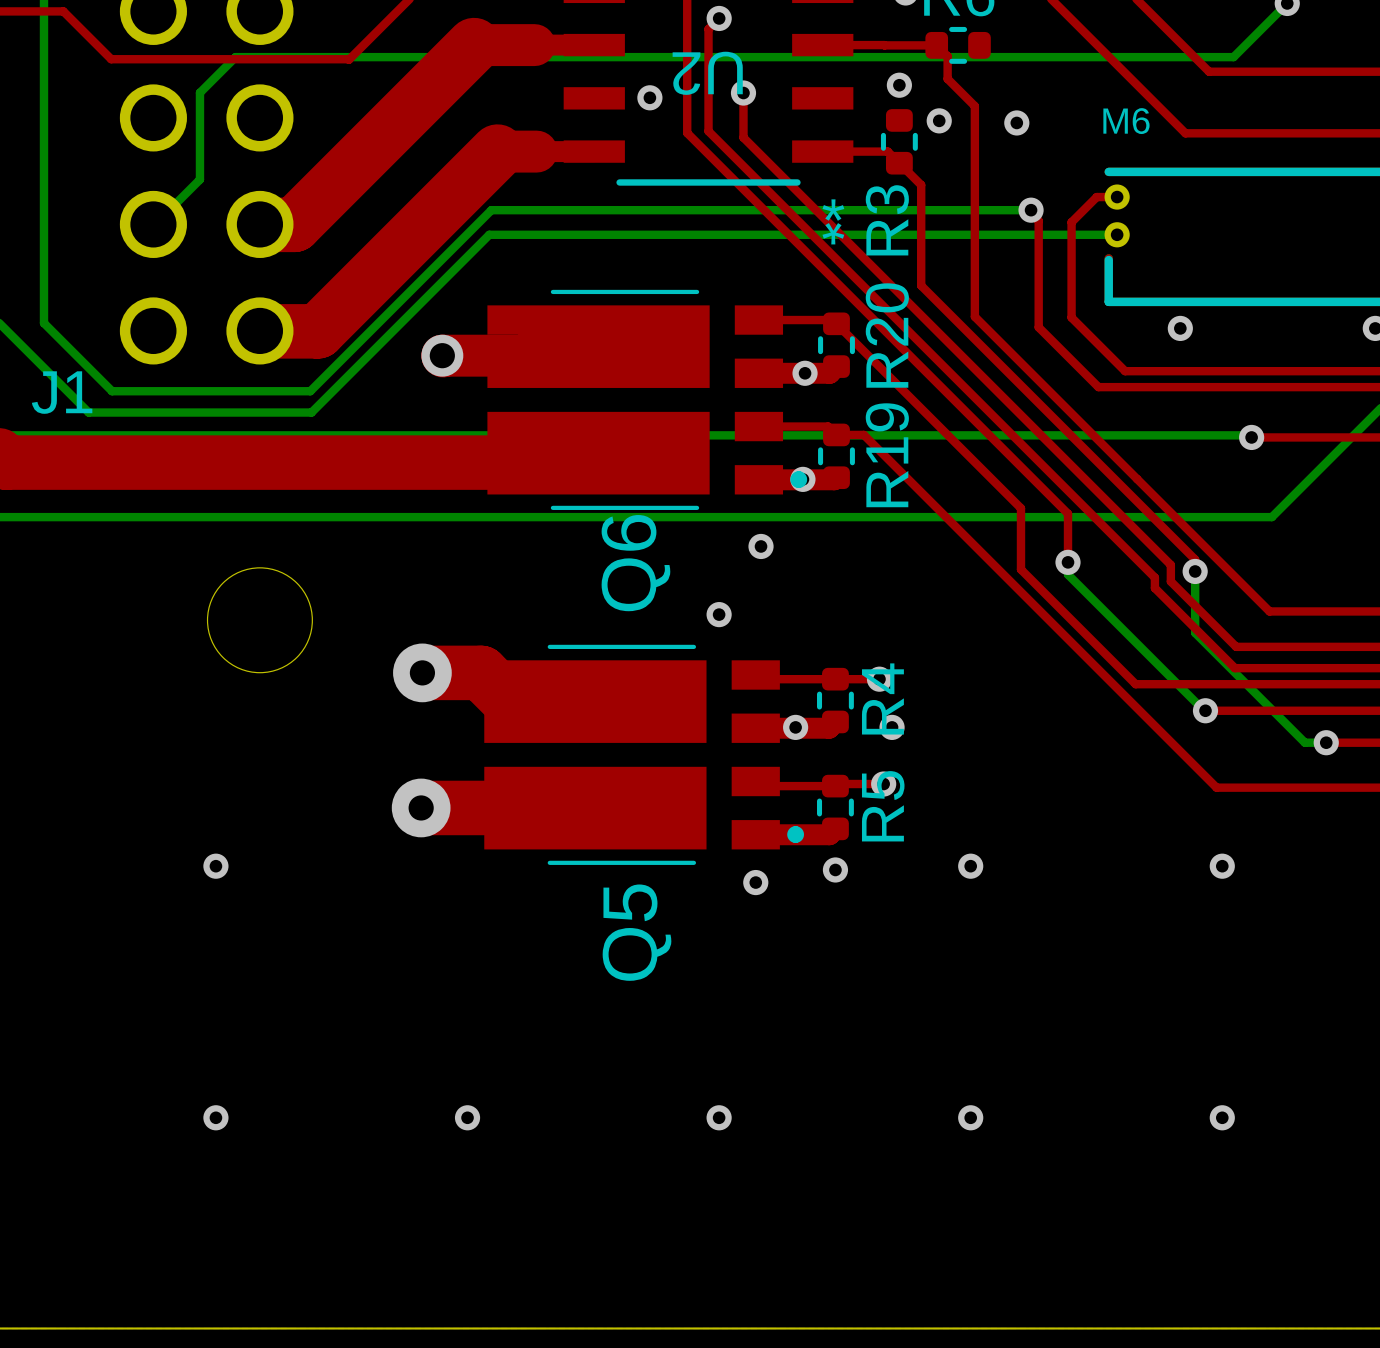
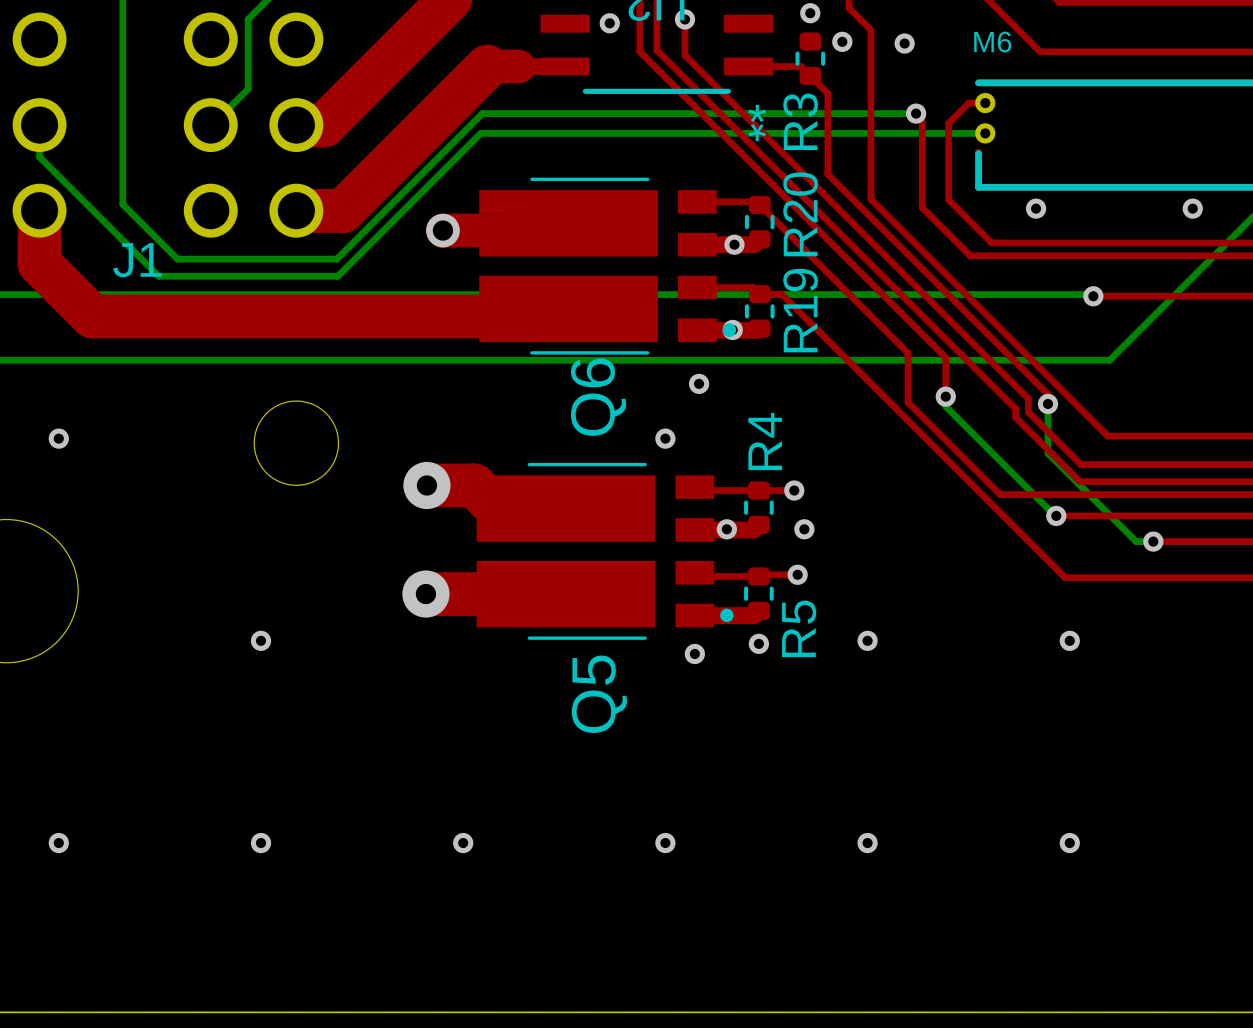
R4 name position: R4 (882, 698) -> R4 (765, 441)
R5 name position: R5 (883, 806) -> R5 (799, 628)

